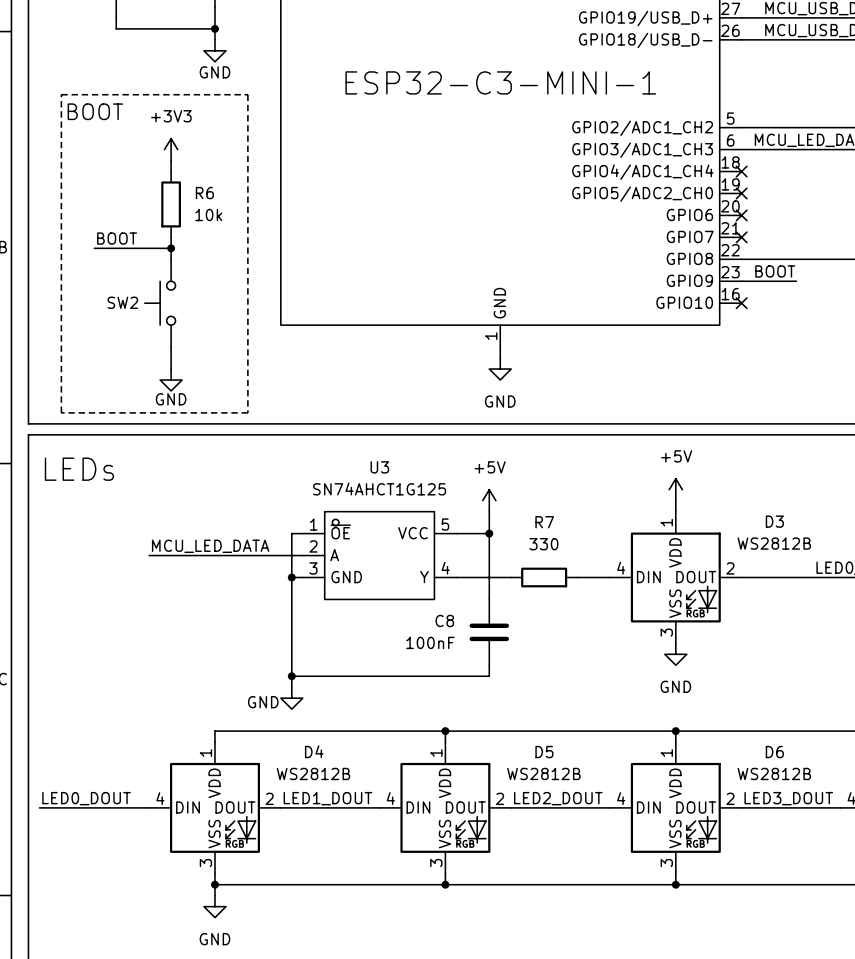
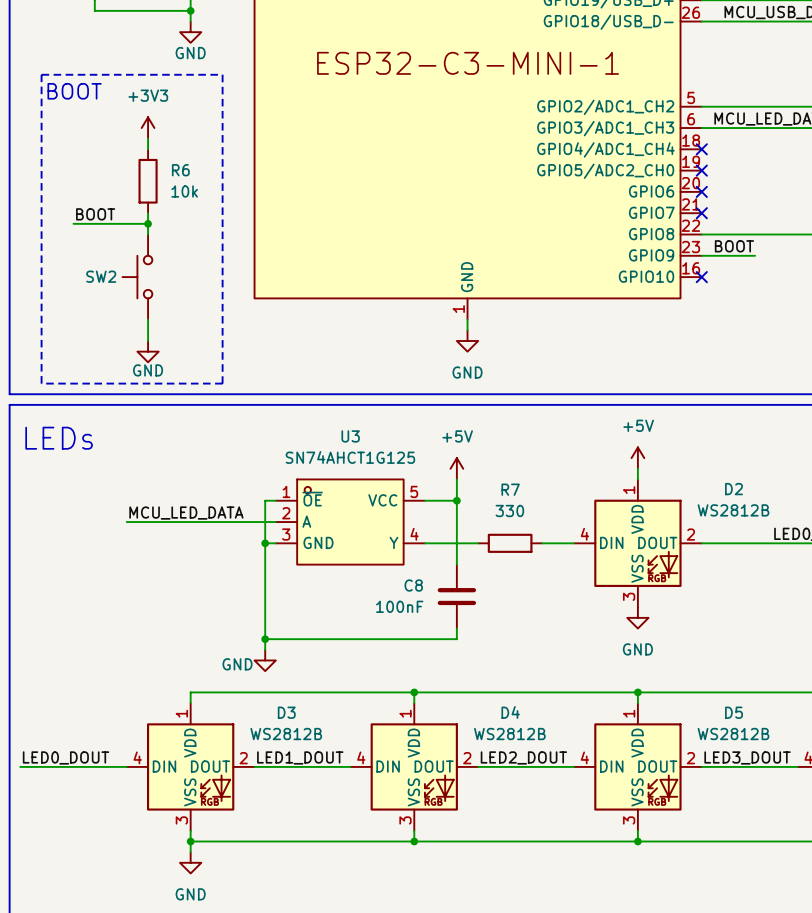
D3 name: D3 (774, 521) -> D2 (734, 489)
D4 name: D4 (314, 751) -> D3 (286, 712)
D5 name: D5 (544, 752) -> D4 (510, 712)
D6 name: D6 (774, 752) -> D5 (734, 712)

